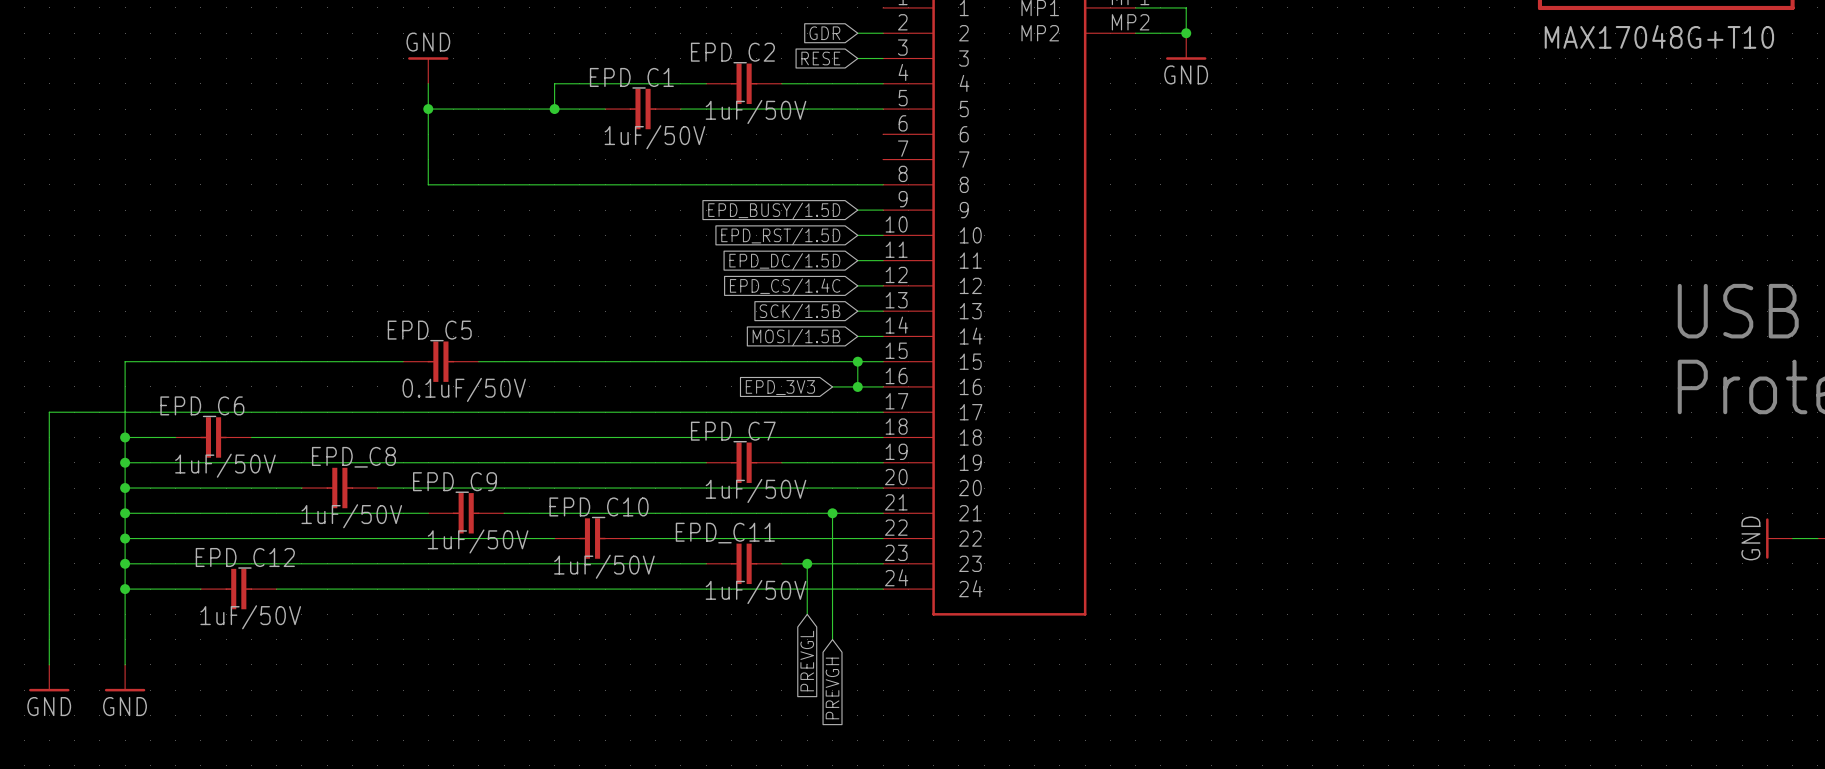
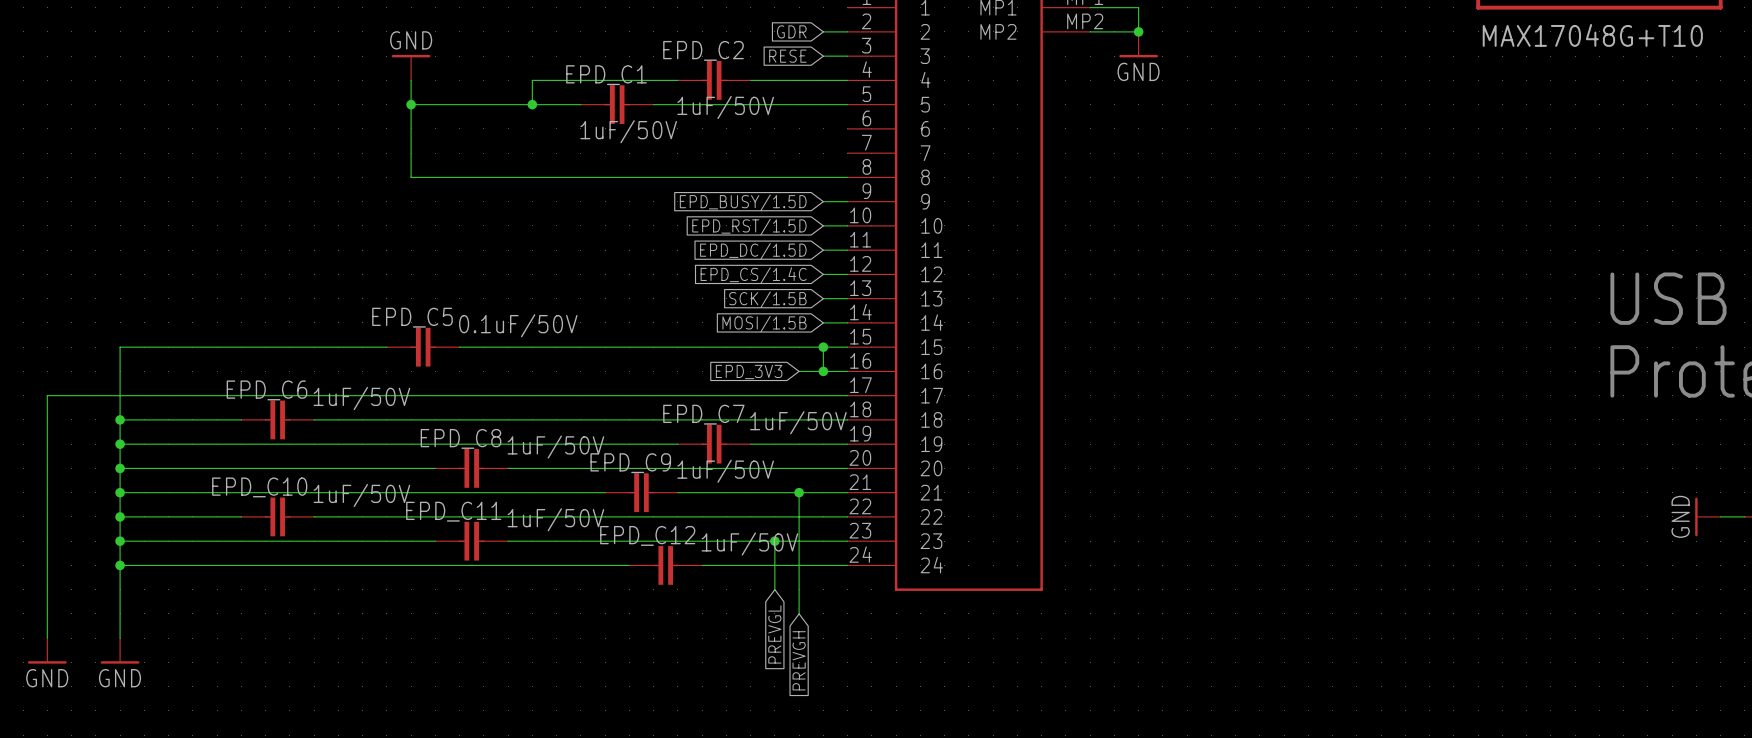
EPD_C5 value position: 0.1uF/50V (464, 389) -> 0.1uF/50V (518, 325)
EPD_C6 position: (213, 437) -> (277, 419)
EPD_C8 name position: EPD_C8 (353, 457) -> EPD_C8 (461, 438)
EPD_C6 value position: 1uF/50V (225, 465) -> 1uF/50V (361, 398)
EPD_C8 position: (339, 488) -> (471, 468)
EPD_C7 value position: 1uF/50V (756, 490) -> 1uF/50V (798, 422)
EPD_C10 name position: EPD_C10 (599, 507) -> EPD_C10 (259, 487)
EPD_C9 position: (466, 513) -> (641, 492)
EPD_C8 value position: 1uF/50V (351, 516) -> 1uF/50V (555, 447)
EPD_C10 position: (592, 538) -> (277, 516)
EPD_C9 value position: 1uF/50V (478, 541) -> 1uF/50V (725, 471)
EPD_C12 name position: EPD_C12 (245, 558) -> EPD_C12 (647, 535)
EPD_C11 position: (744, 563) -> (471, 541)
EPD_C10 value position: 1uF/50V (604, 566) -> 1uF/50V (361, 495)
EPD_C12 position: (238, 589) -> (665, 565)
EPD_C11 value position: 1uF/50V (756, 592) -> 1uF/50V (555, 519)
EPD_C12 value position: 1uF/50V (250, 617) -> 1uF/50V (749, 544)

